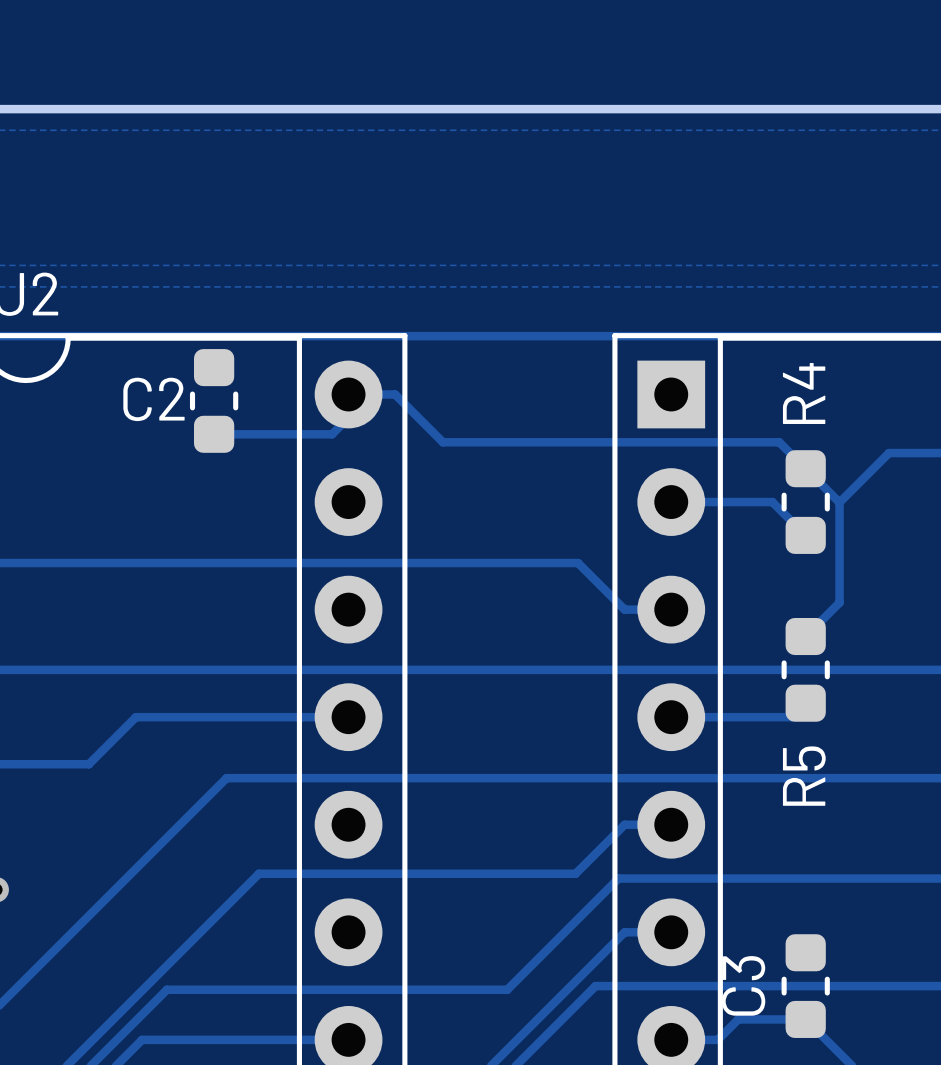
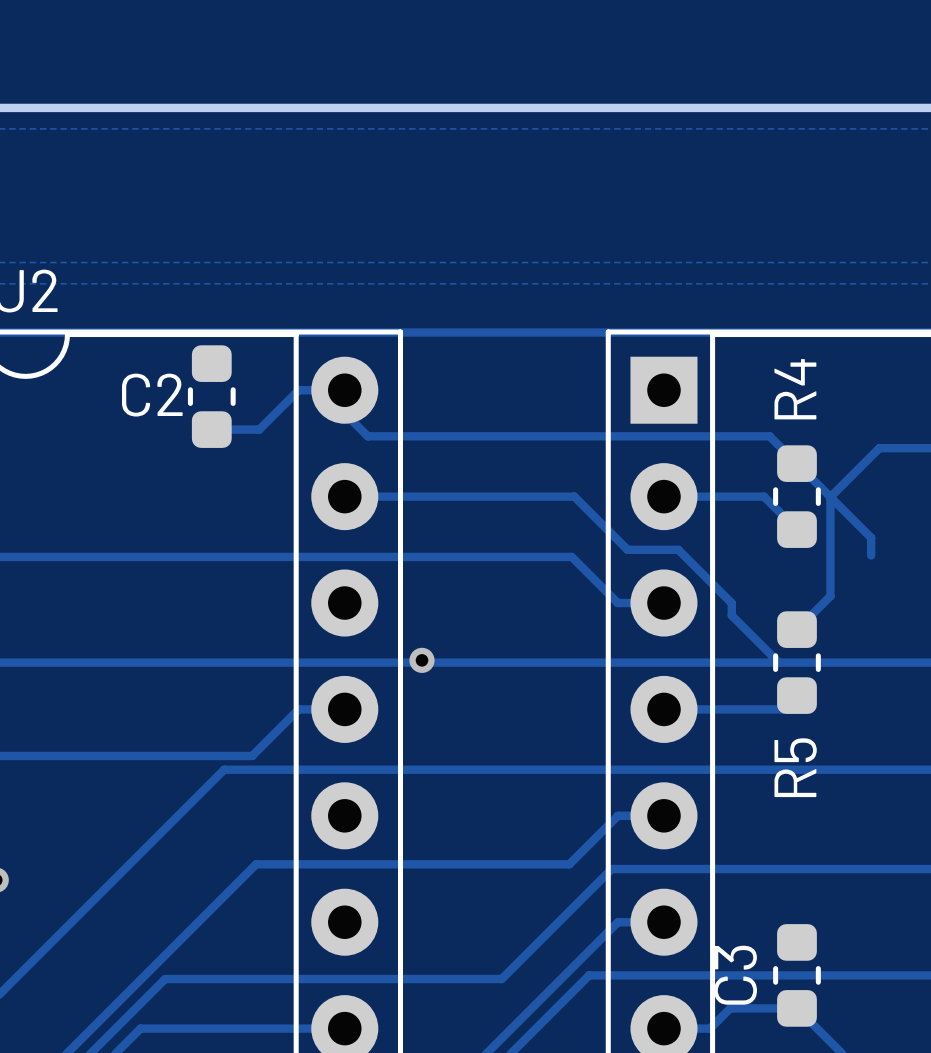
track: (348, 394) (395, 394) (442, 442) (779, 442) -> (321, 390) (367, 436) (770, 437)
track: (371, 394) (332, 434) (262, 434) -> (344, 390) (298, 390) (259, 429)
track: none -> (344, 496) (574, 496) (627, 549) (678, 549) (731, 603) (731, 615) (778, 662)
track: none -> (830, 497) (871, 537) (871, 555)
via: none -> (422, 660)
track: (301, 717) (135, 717) (88, 764) -> (298, 709) (252, 755) (87, 755)

